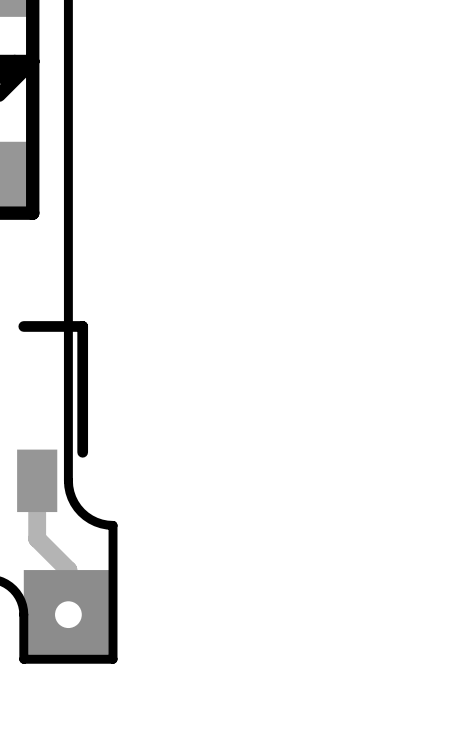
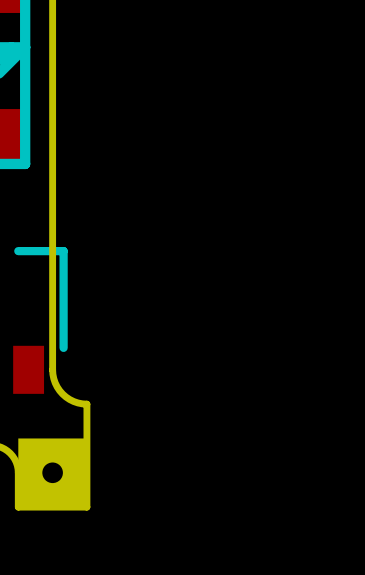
track: (37, 480) (37, 538) (68, 570) (68, 614) -> none

